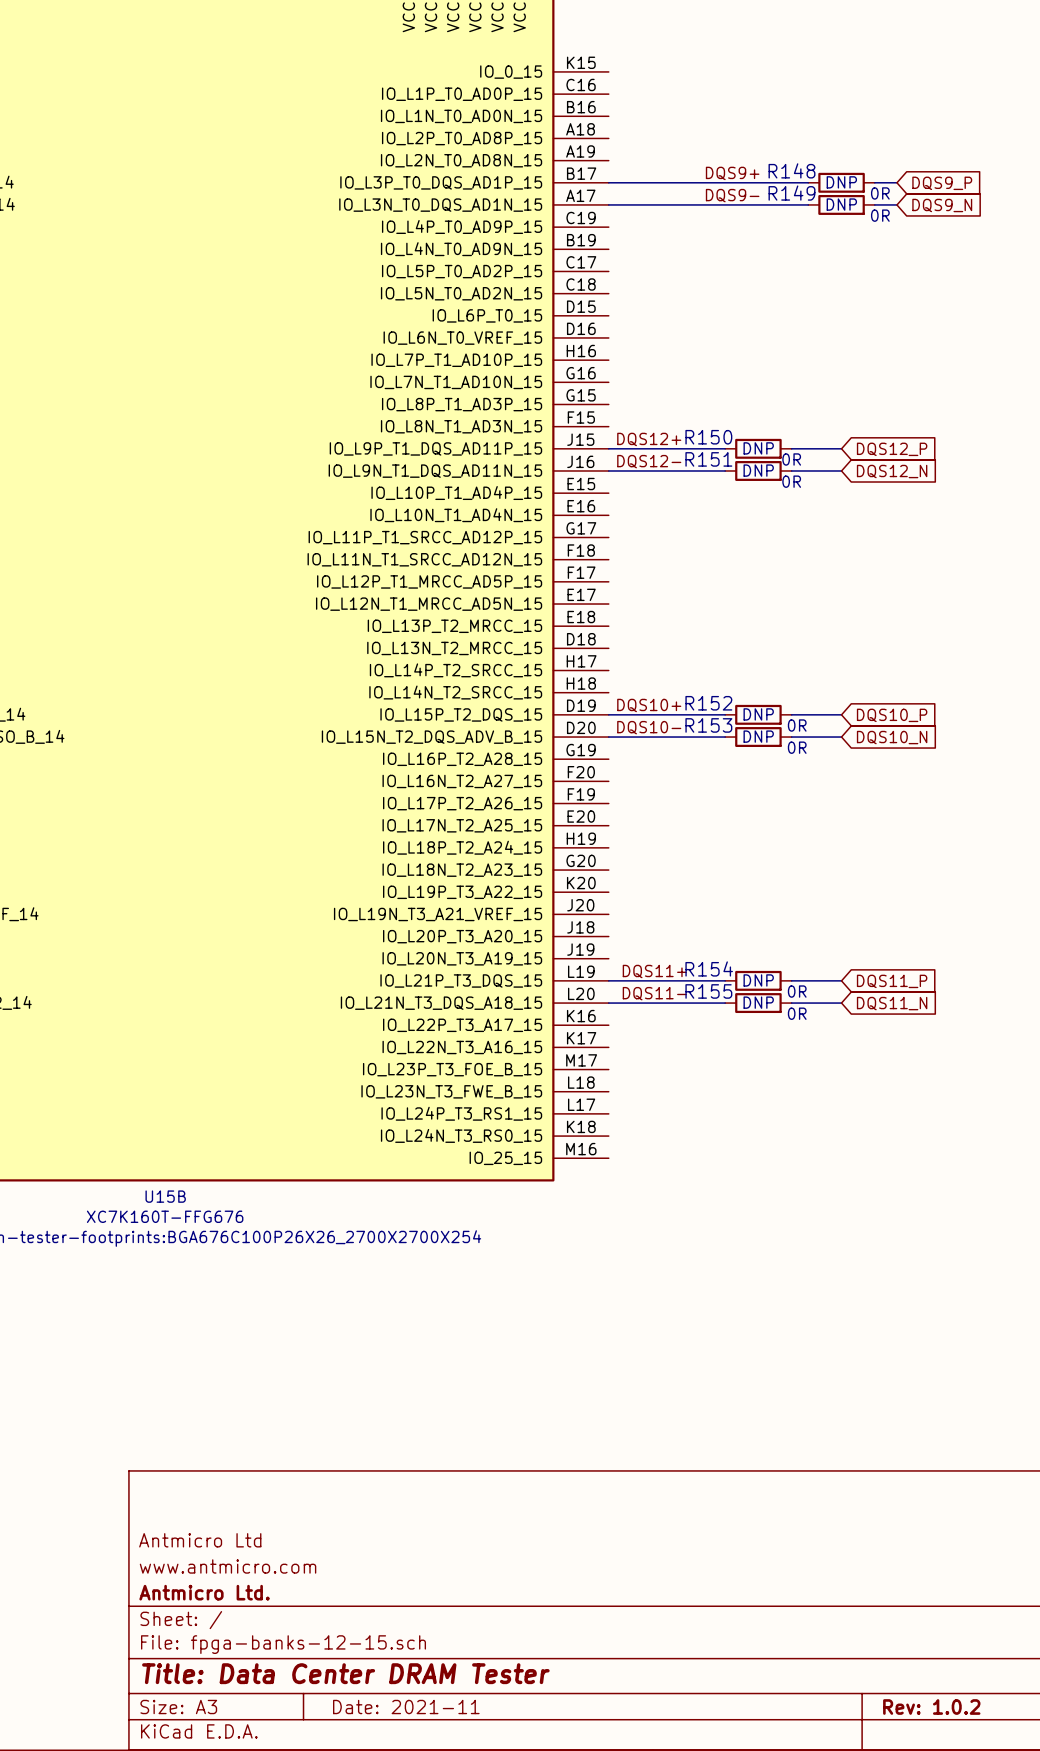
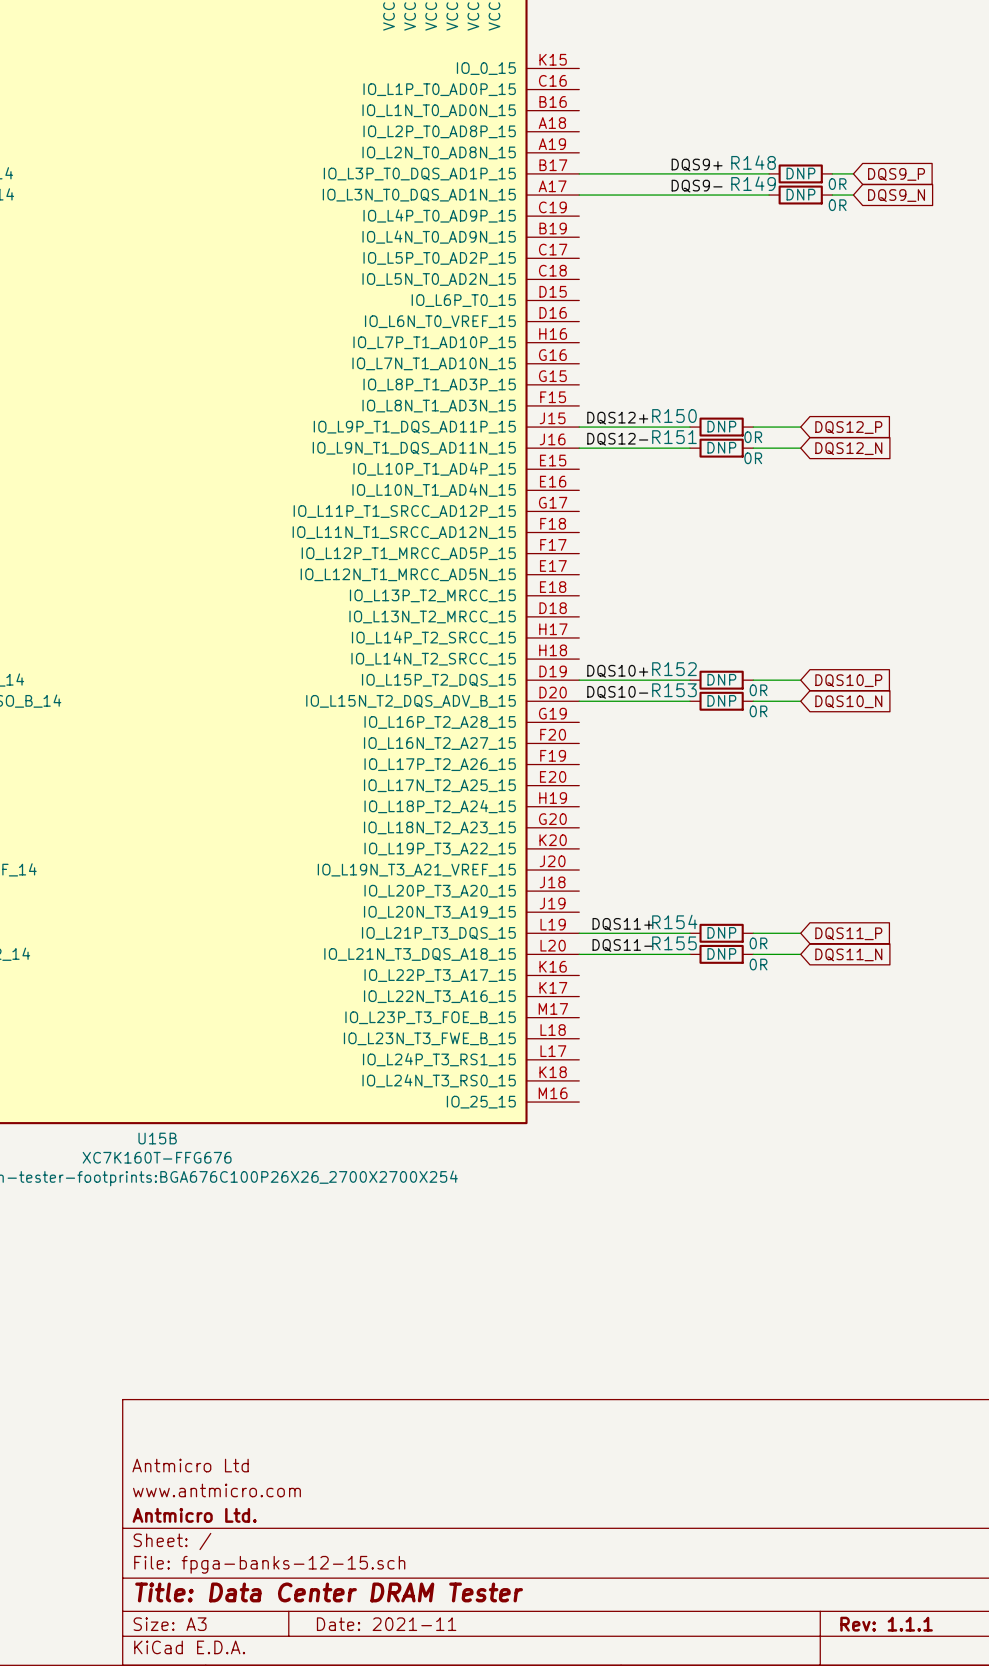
title block: Rev: 1.0.2 (931, 1707) -> Rev: 1.1.1 (886, 1624)

